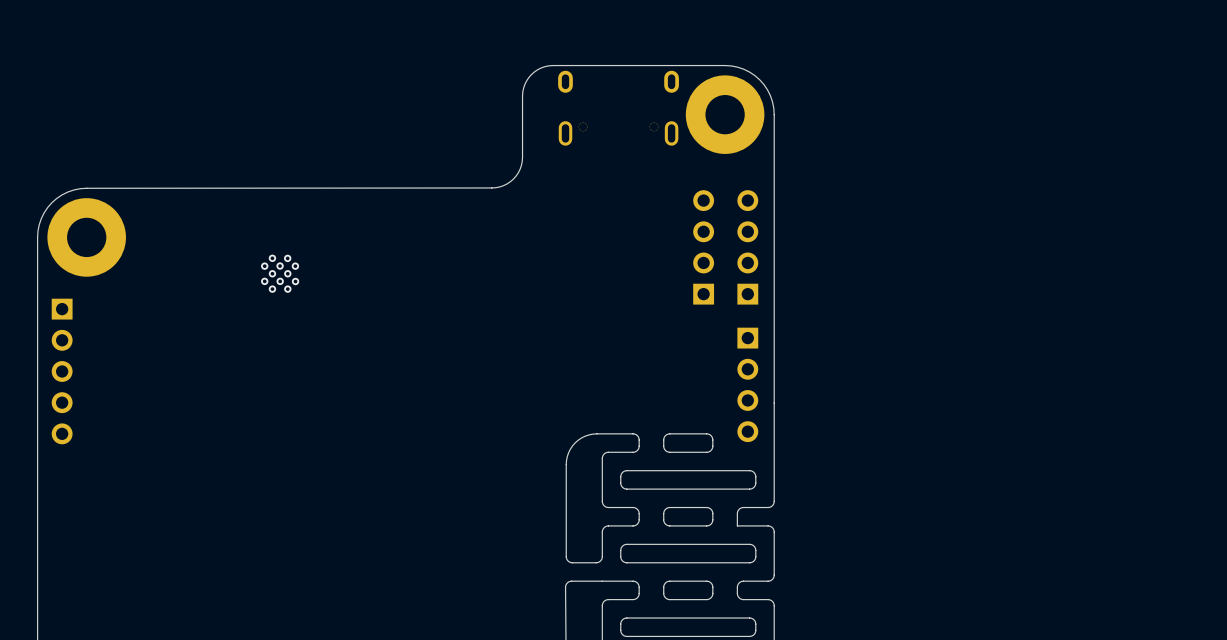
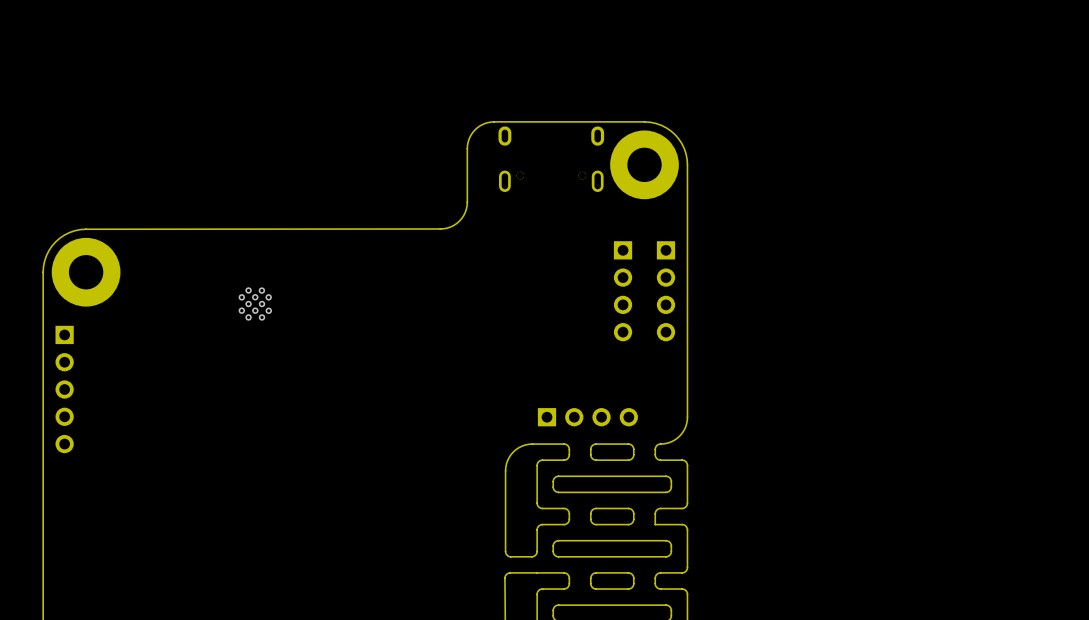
part rotation: 0° (703, 247) -> 180° (623, 291)
part rotation: 0° (747, 247) -> 180° (665, 291)
part rotation: 0° (747, 384) -> 90° counterclockwise (587, 417)
part position: (747, 384) -> (587, 417)
board edge: (774, 403) (774, 458) -> (687, 417) (685, 426) (679, 436) (669, 442) (657, 444) (655, 449) (655, 456) (657, 459) (683, 460) (687, 465)

